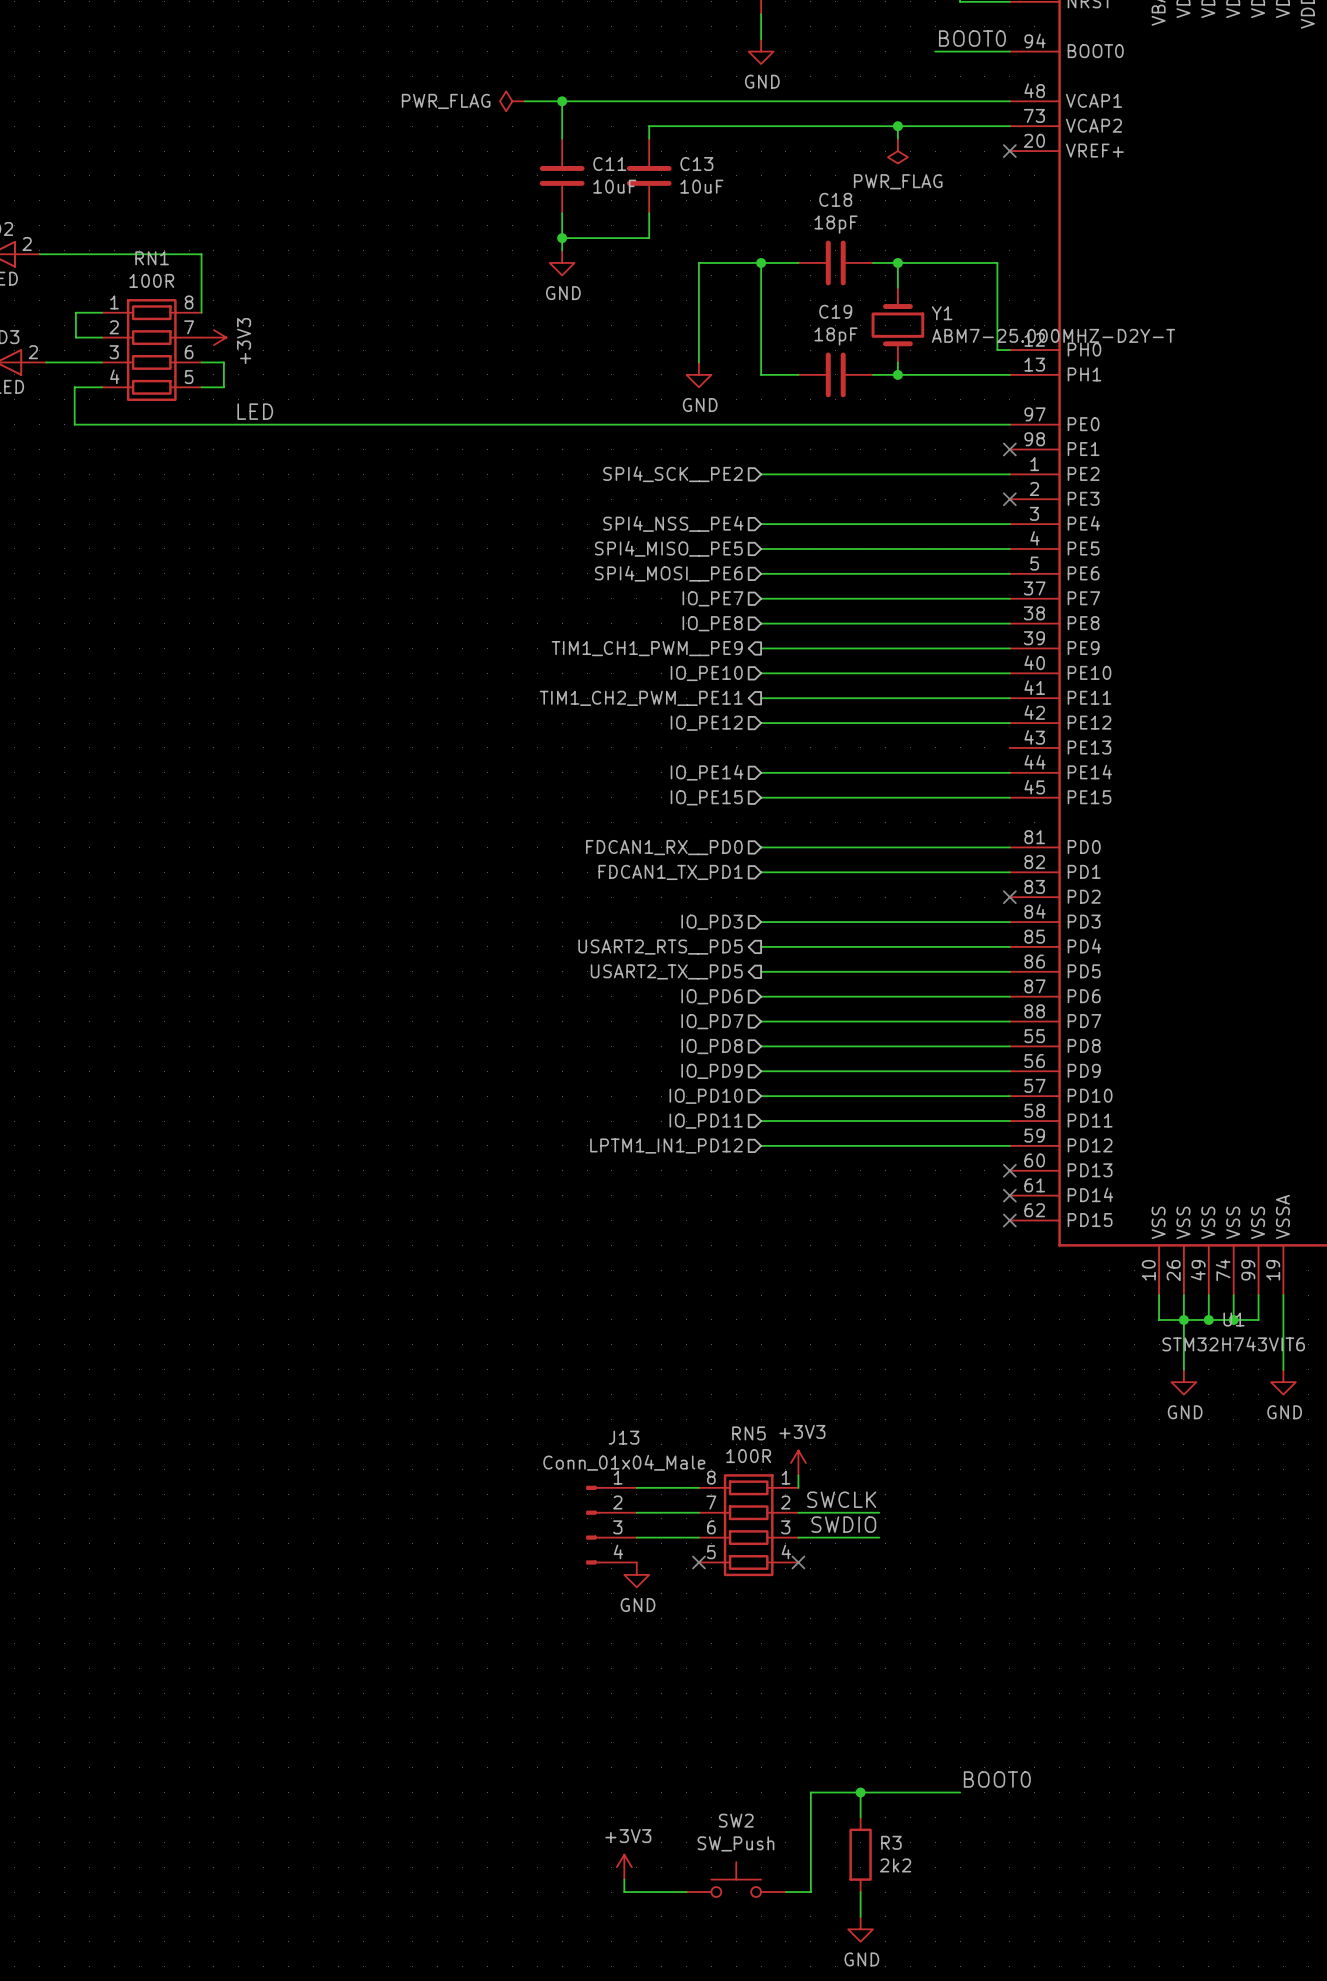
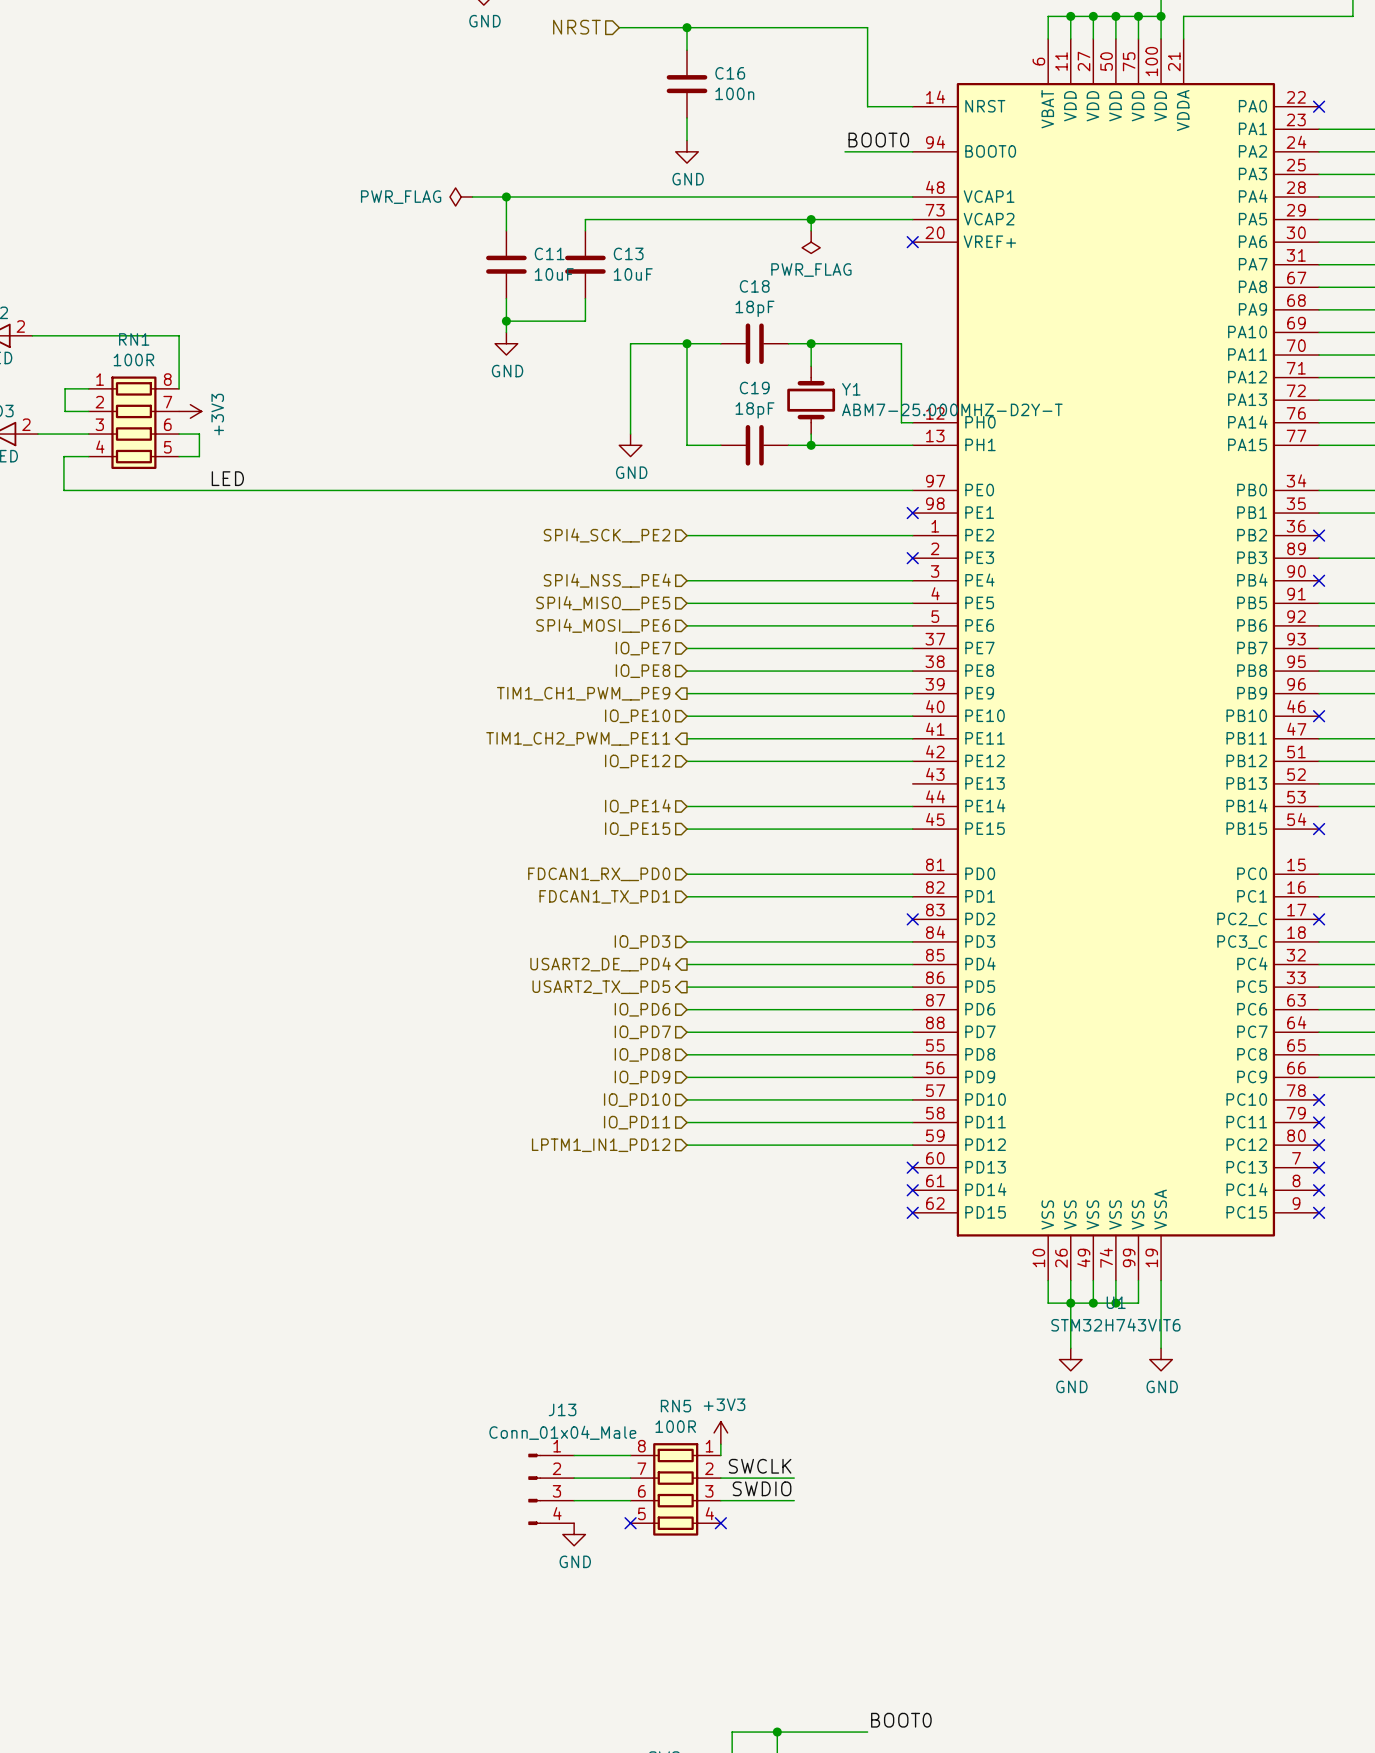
hierarchical label: USART2_RTS__PD5 (660, 947) -> USART2_DE__PD4 (600, 964)

